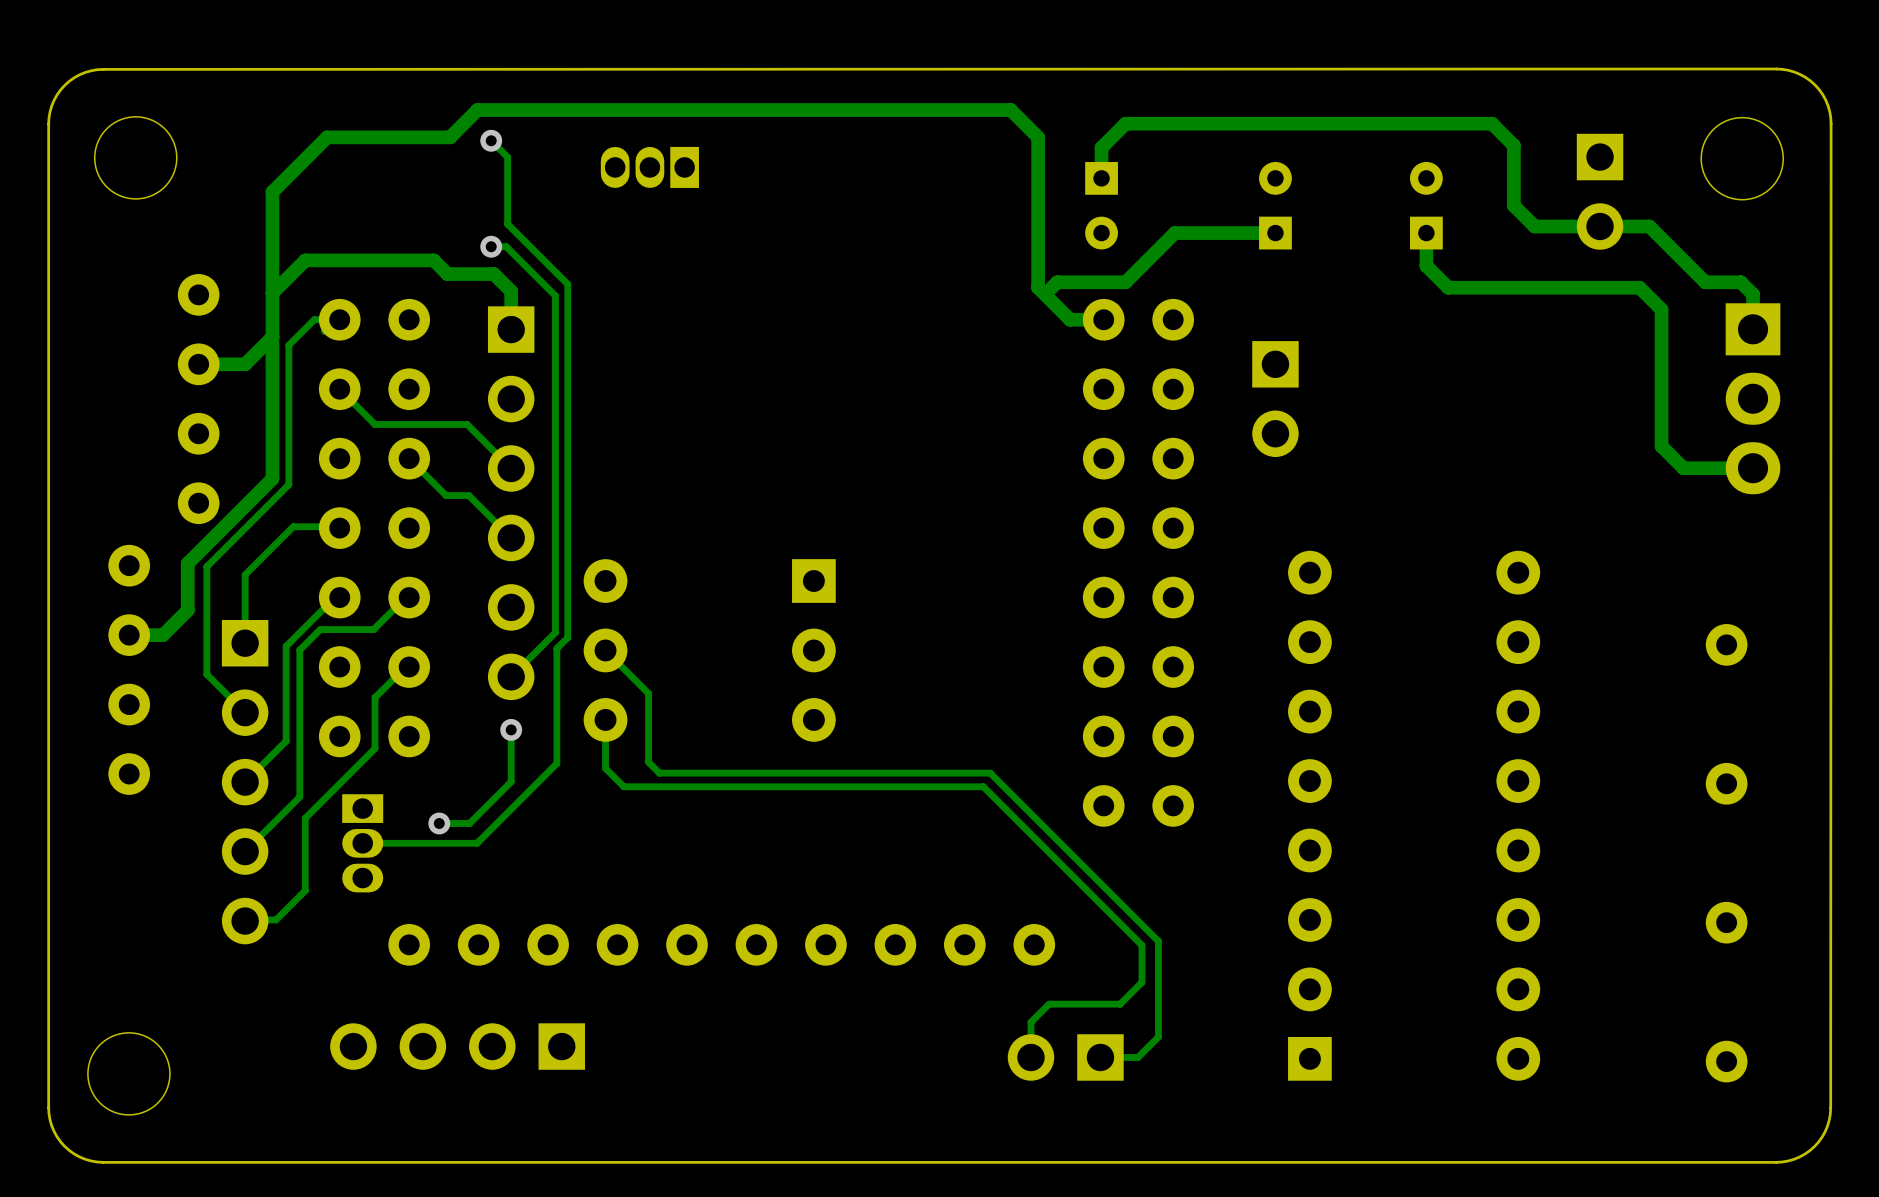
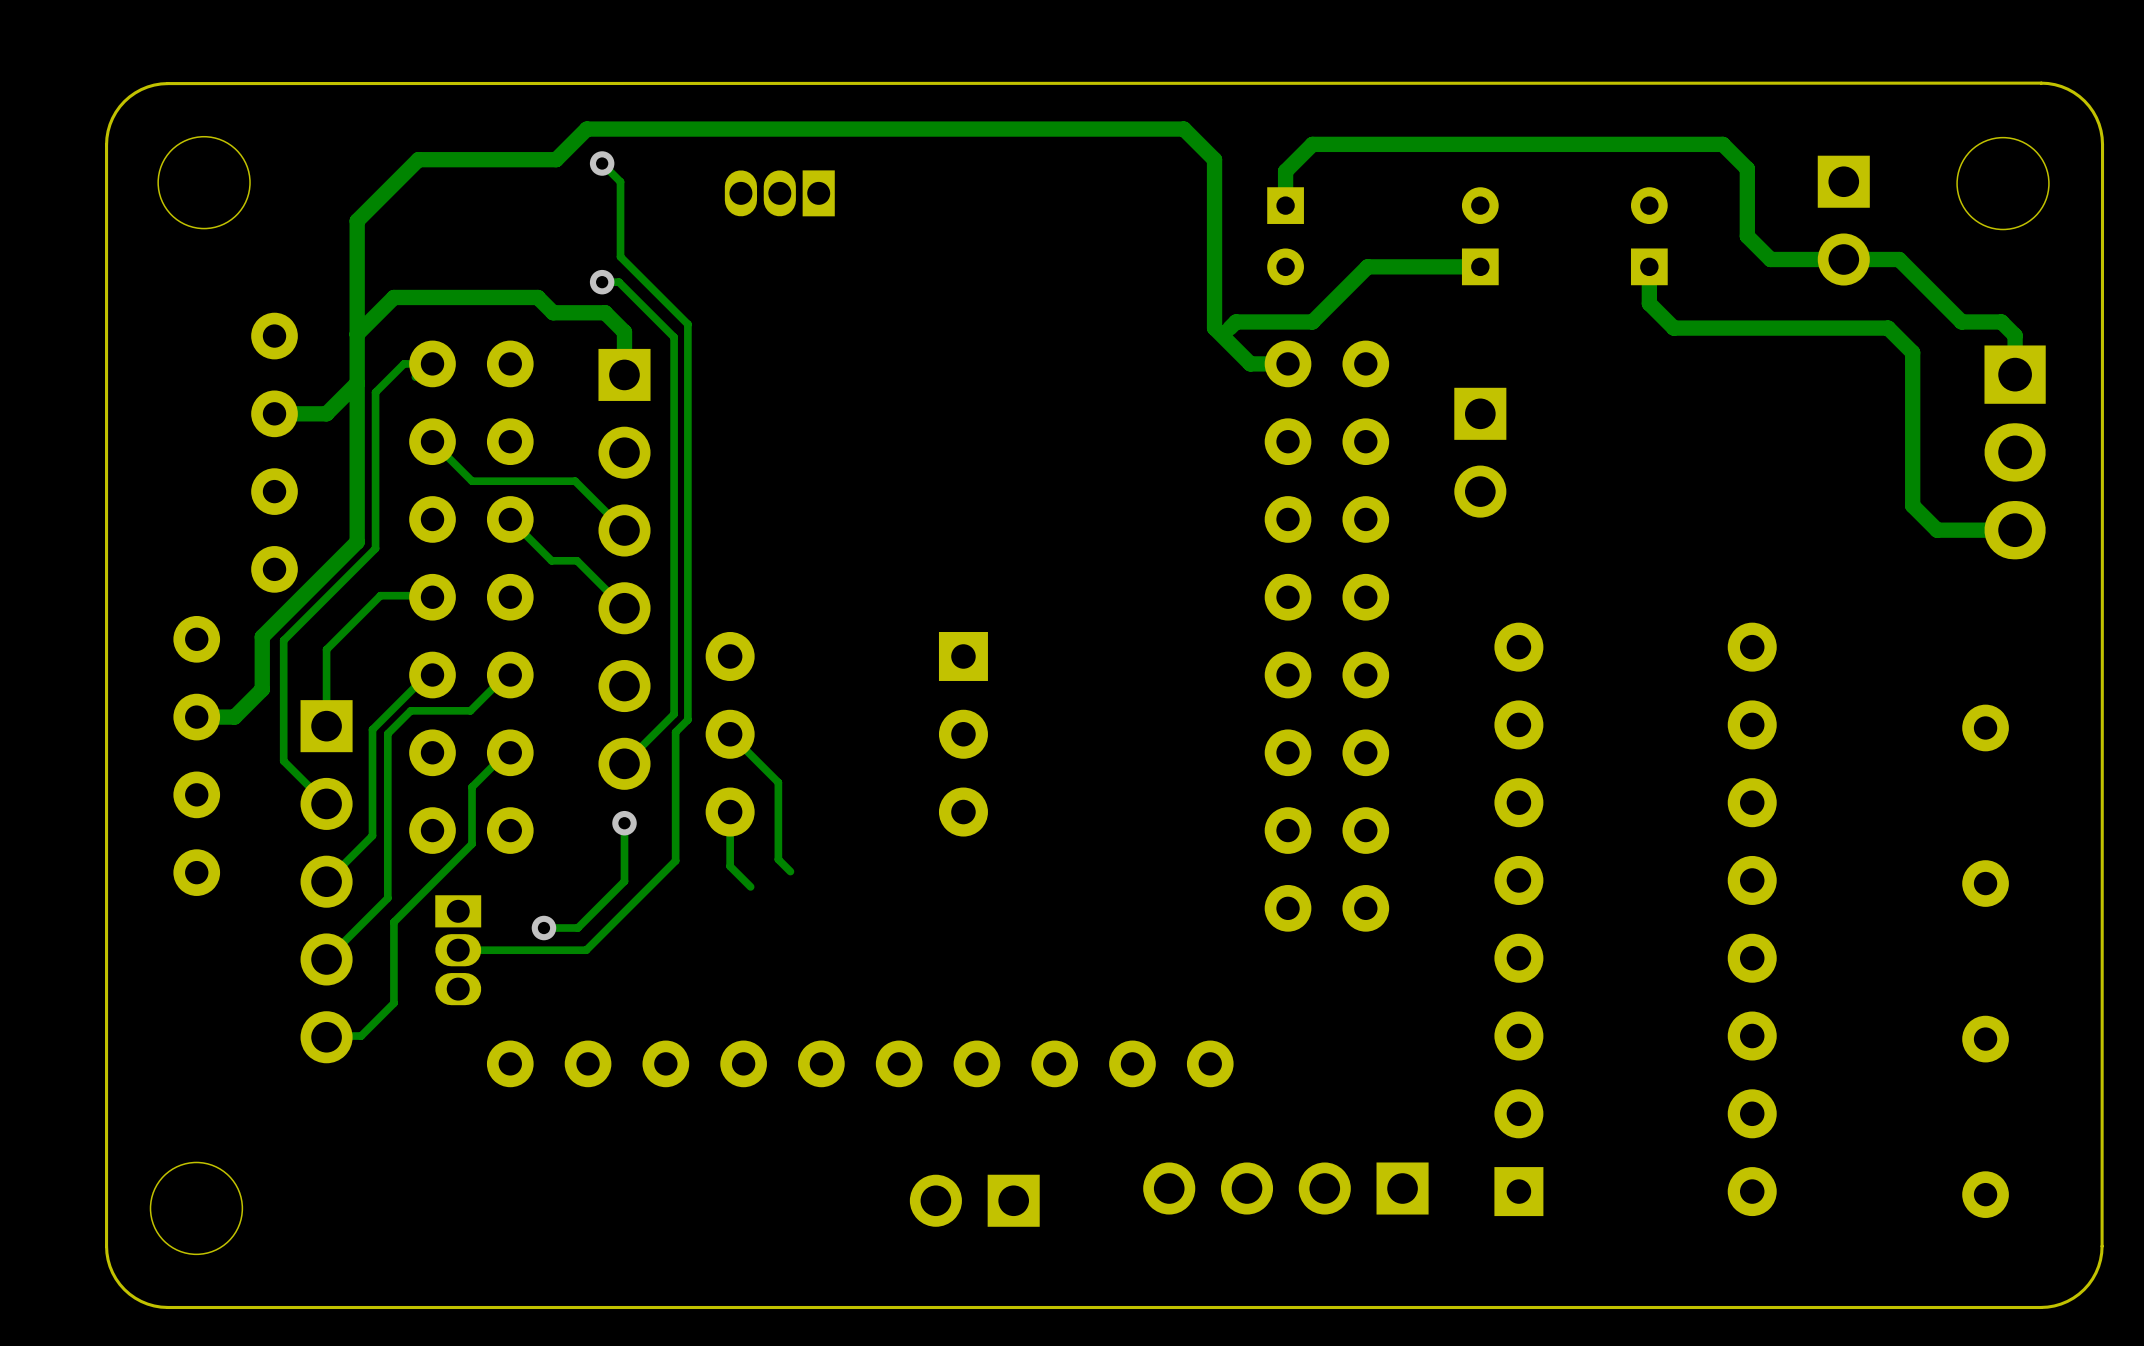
track: (659, 773) (990, 773) (1158, 941) (1158, 1036) (1137, 1057) (1100, 1057) -> none
track: (623, 786) (983, 786) (1142, 945) (1142, 982) (1120, 1004) (1049, 1004) (1031, 1022) (1031, 1057) -> none
part position: (457, 1046) -> (1285, 1188)
part position: (1065, 1057) -> (974, 1200)

